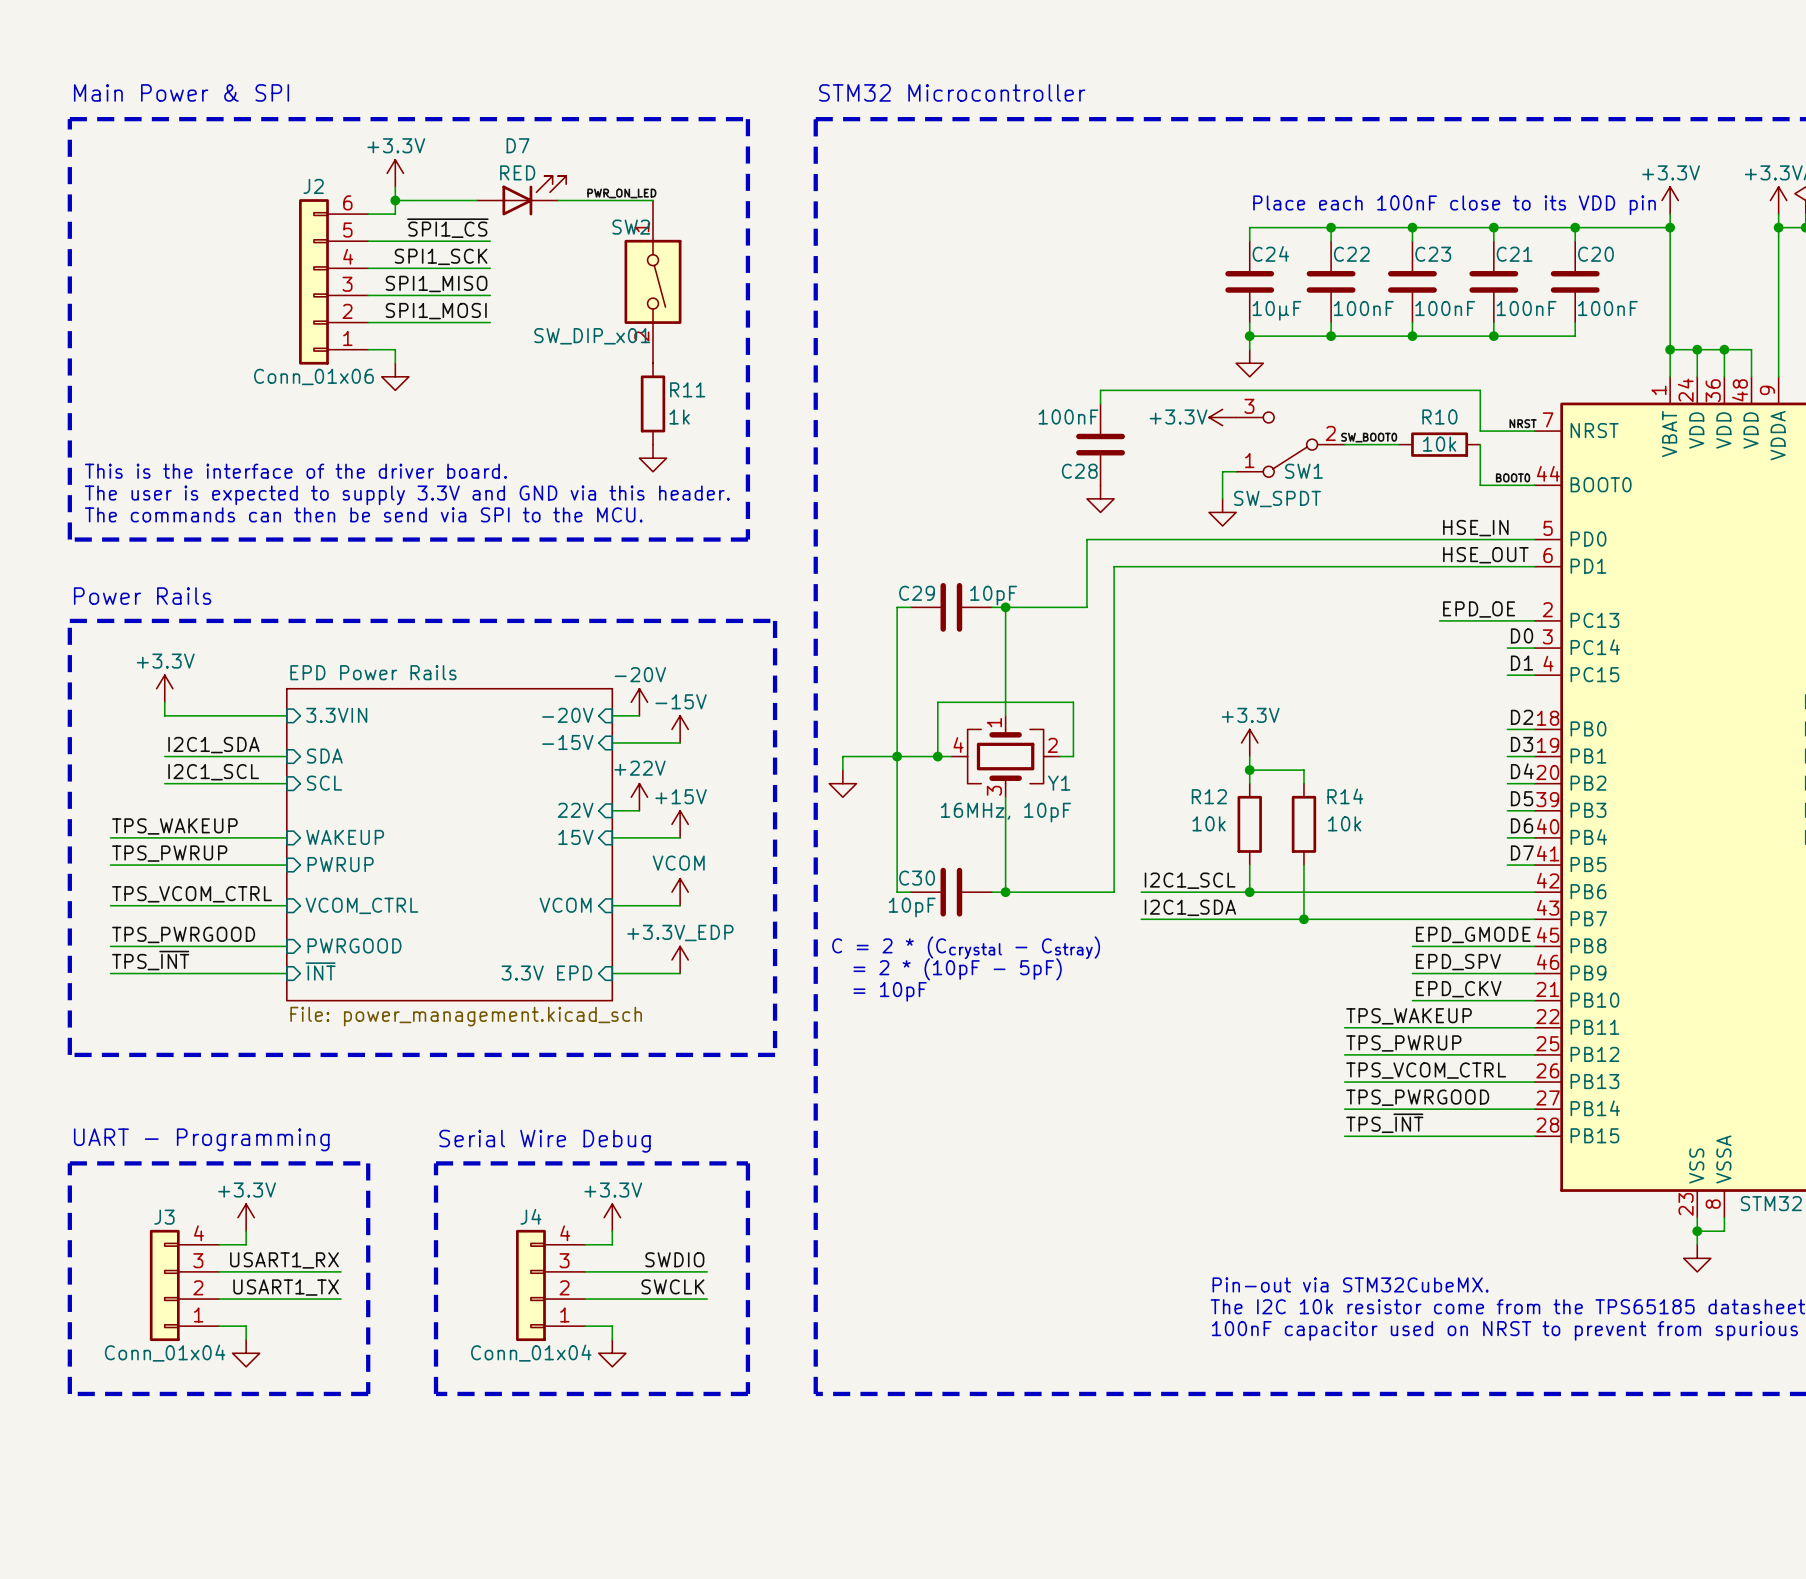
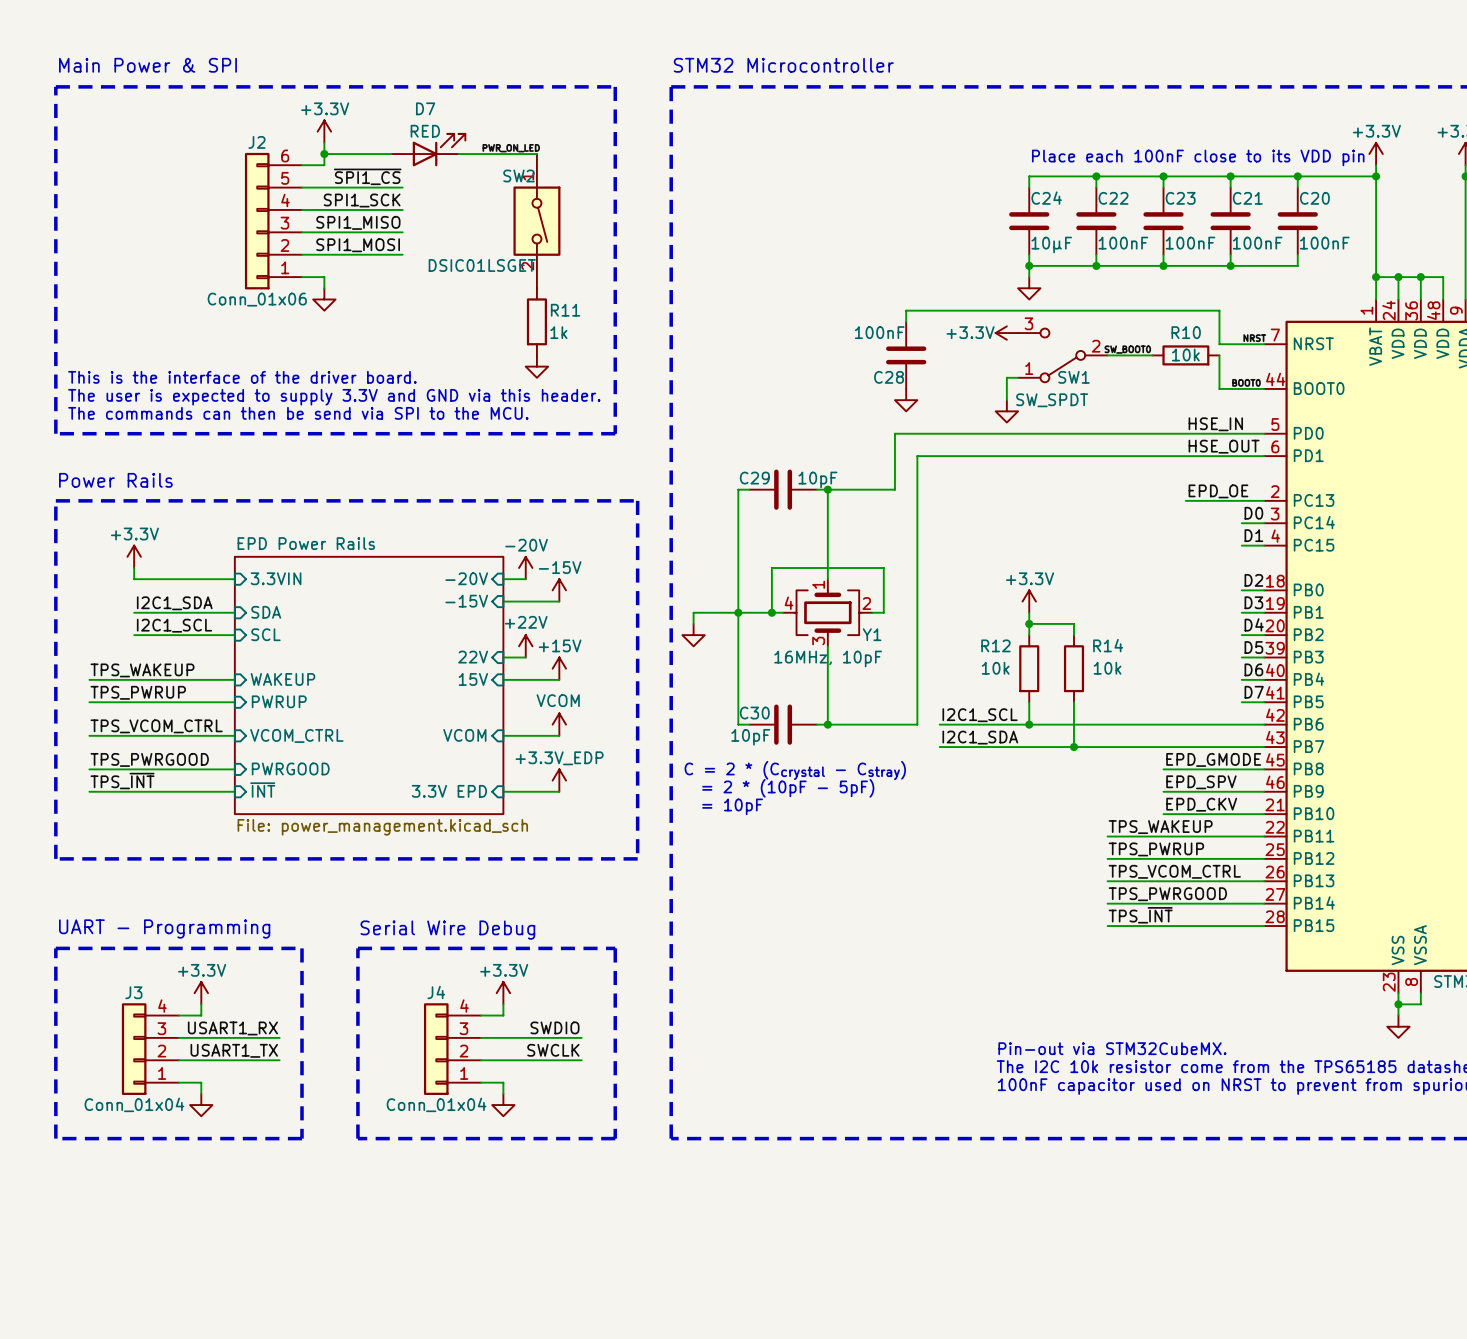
SW2 value: SW_DIP_x01 (592, 336) -> DSIC01LSGET (482, 265)

